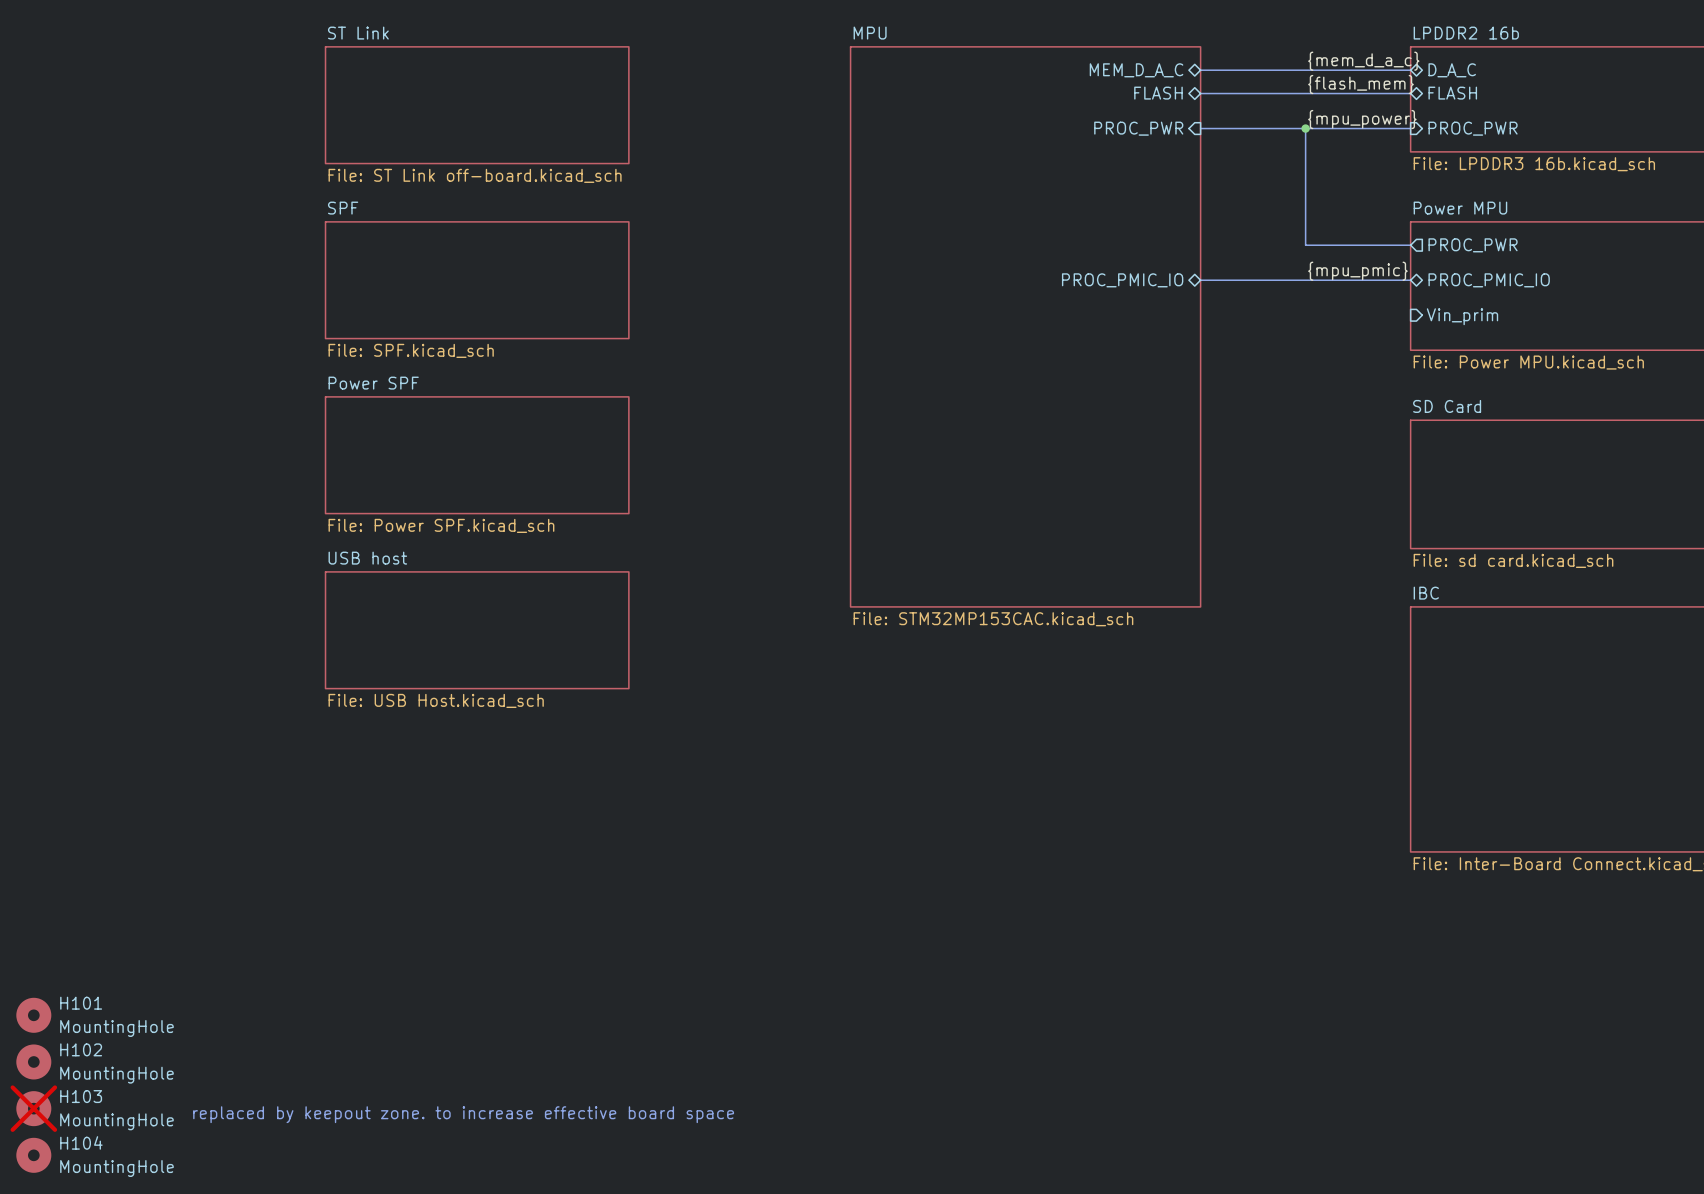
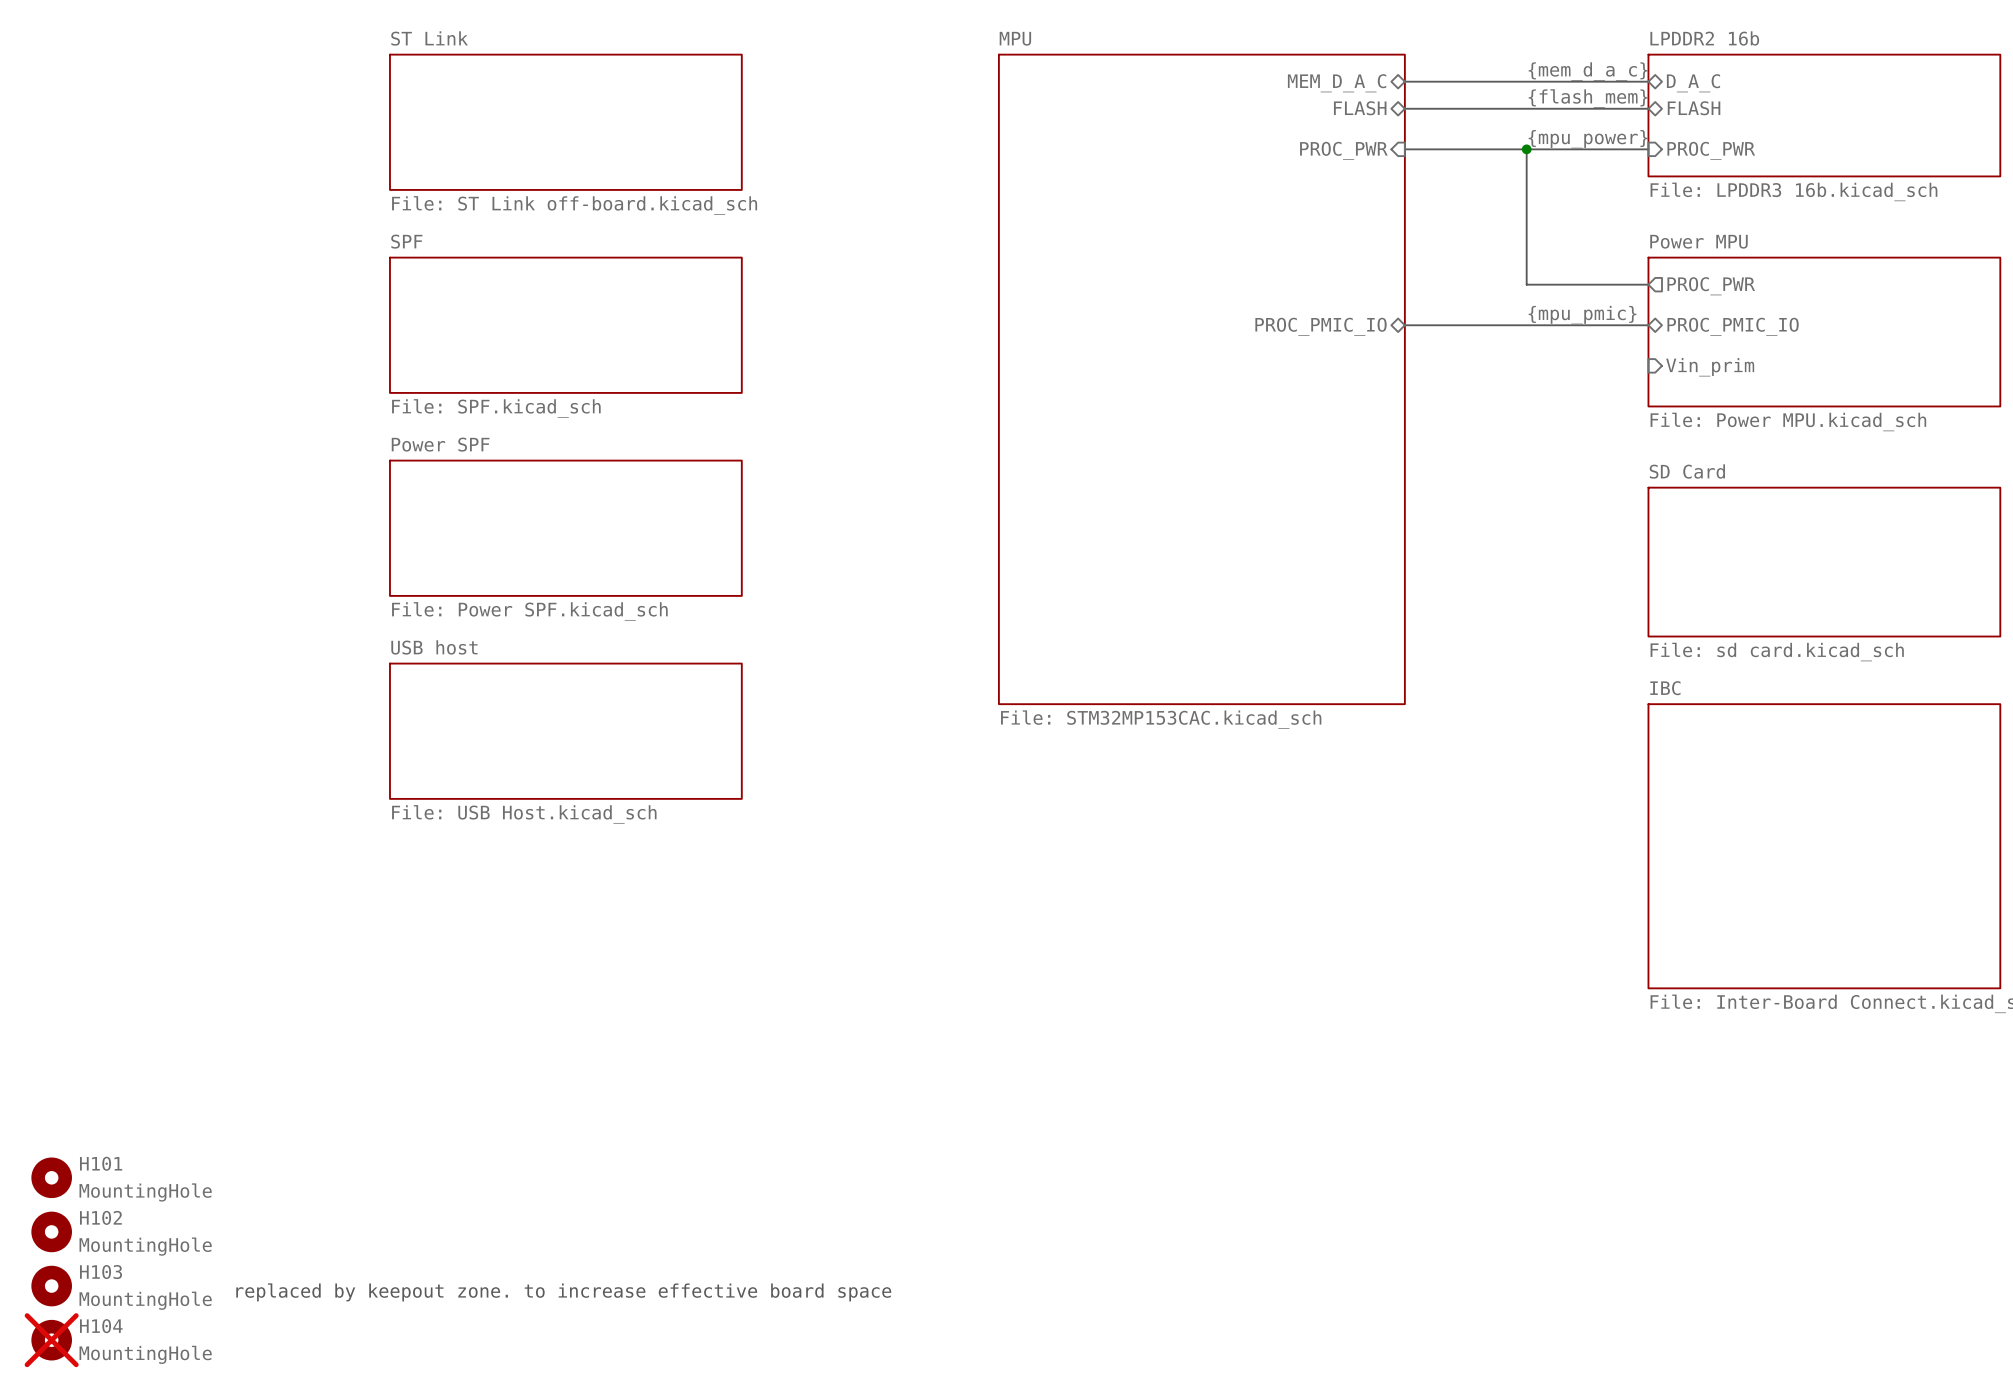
H103 do-not-place cross: (33, 1108) -> none
H104 do-not-place cross: none -> (51, 1340)

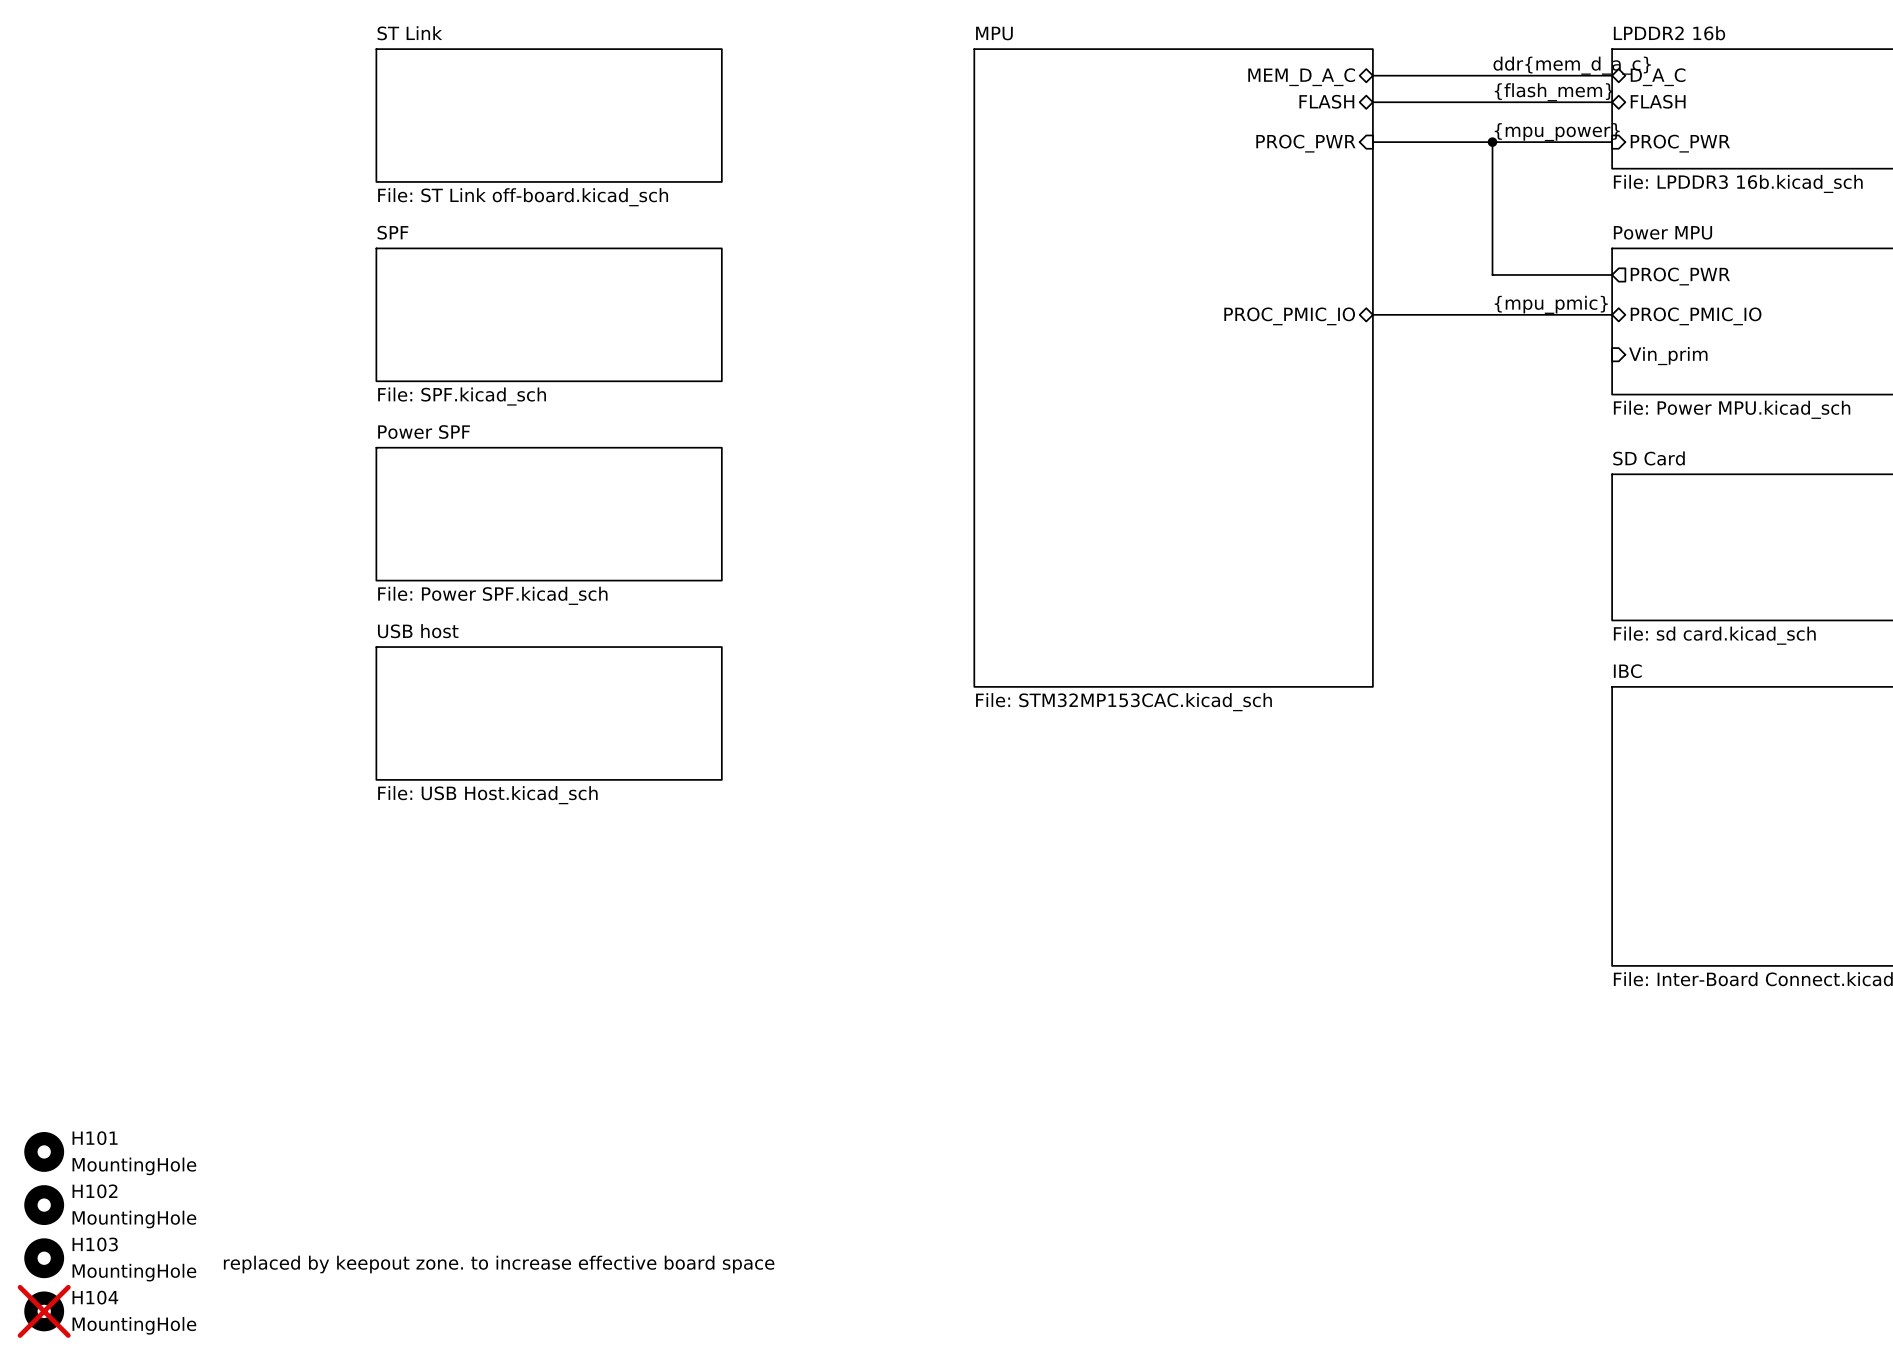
label: {mem_d_a_c} (1588, 71) -> ddr{mem_d_a_c} (1572, 65)

